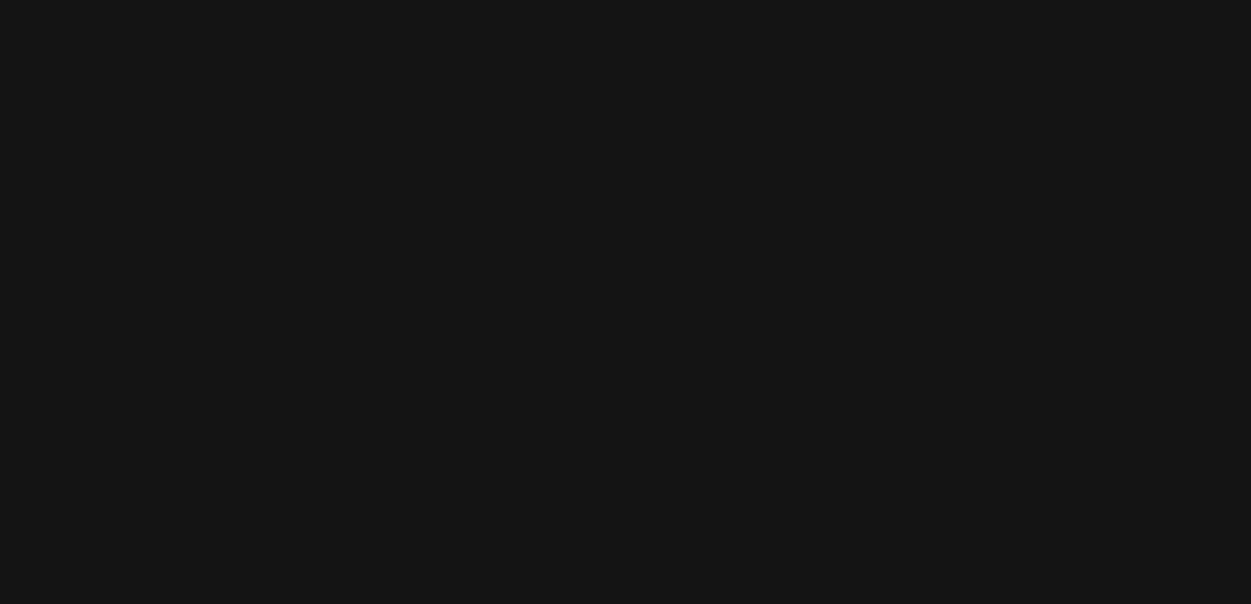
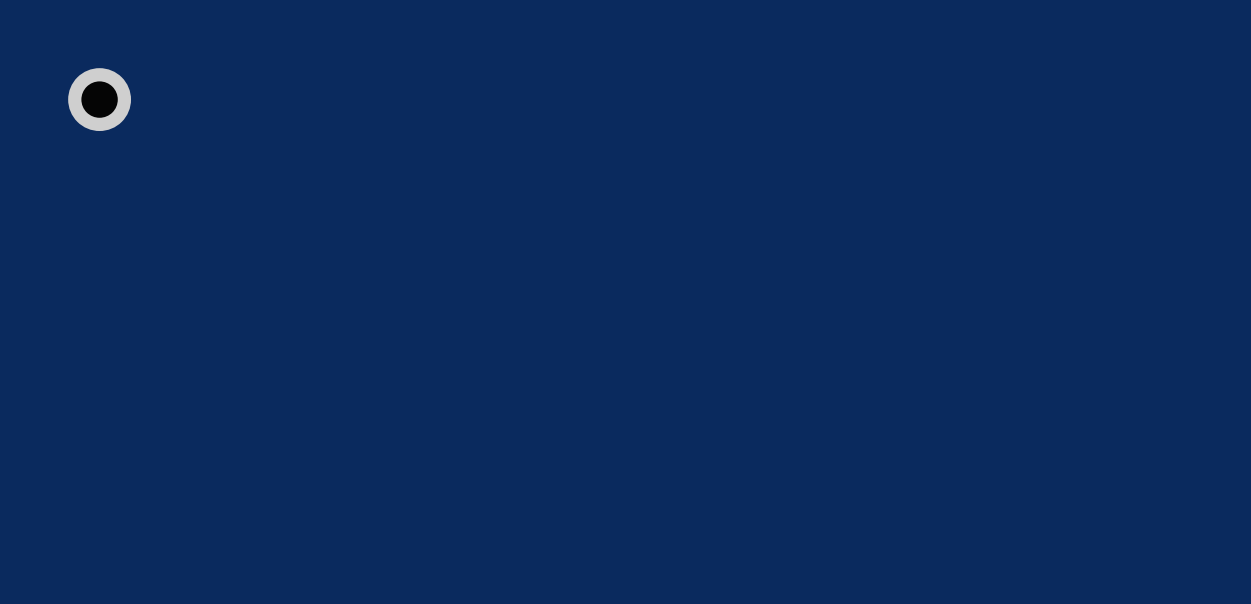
part: none -> (99, 99)

